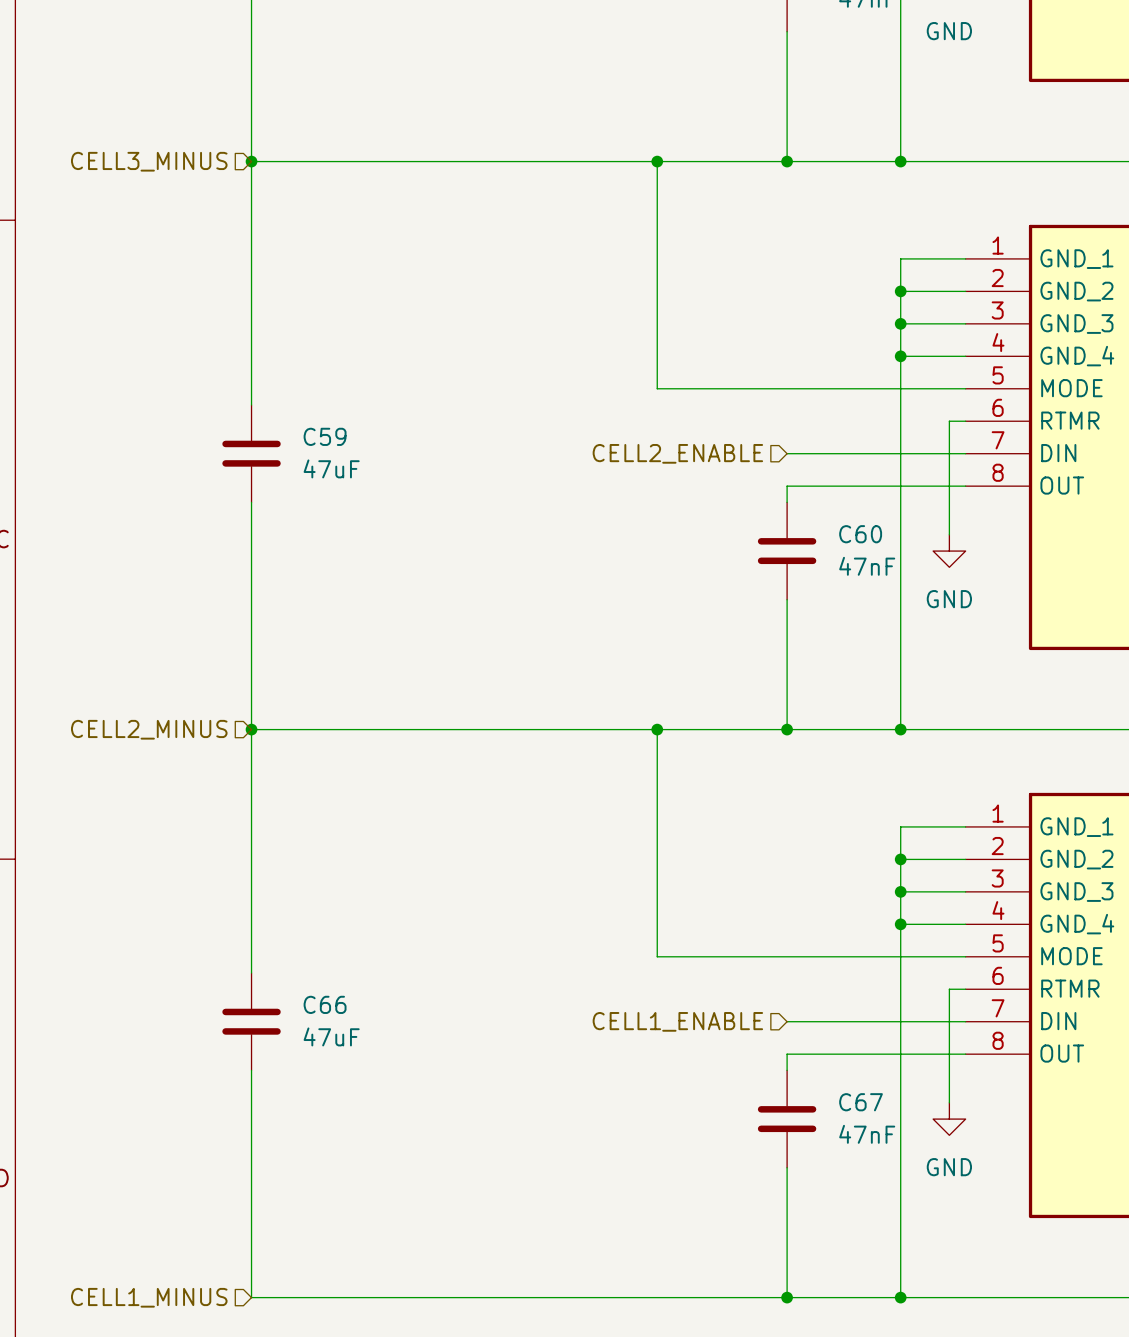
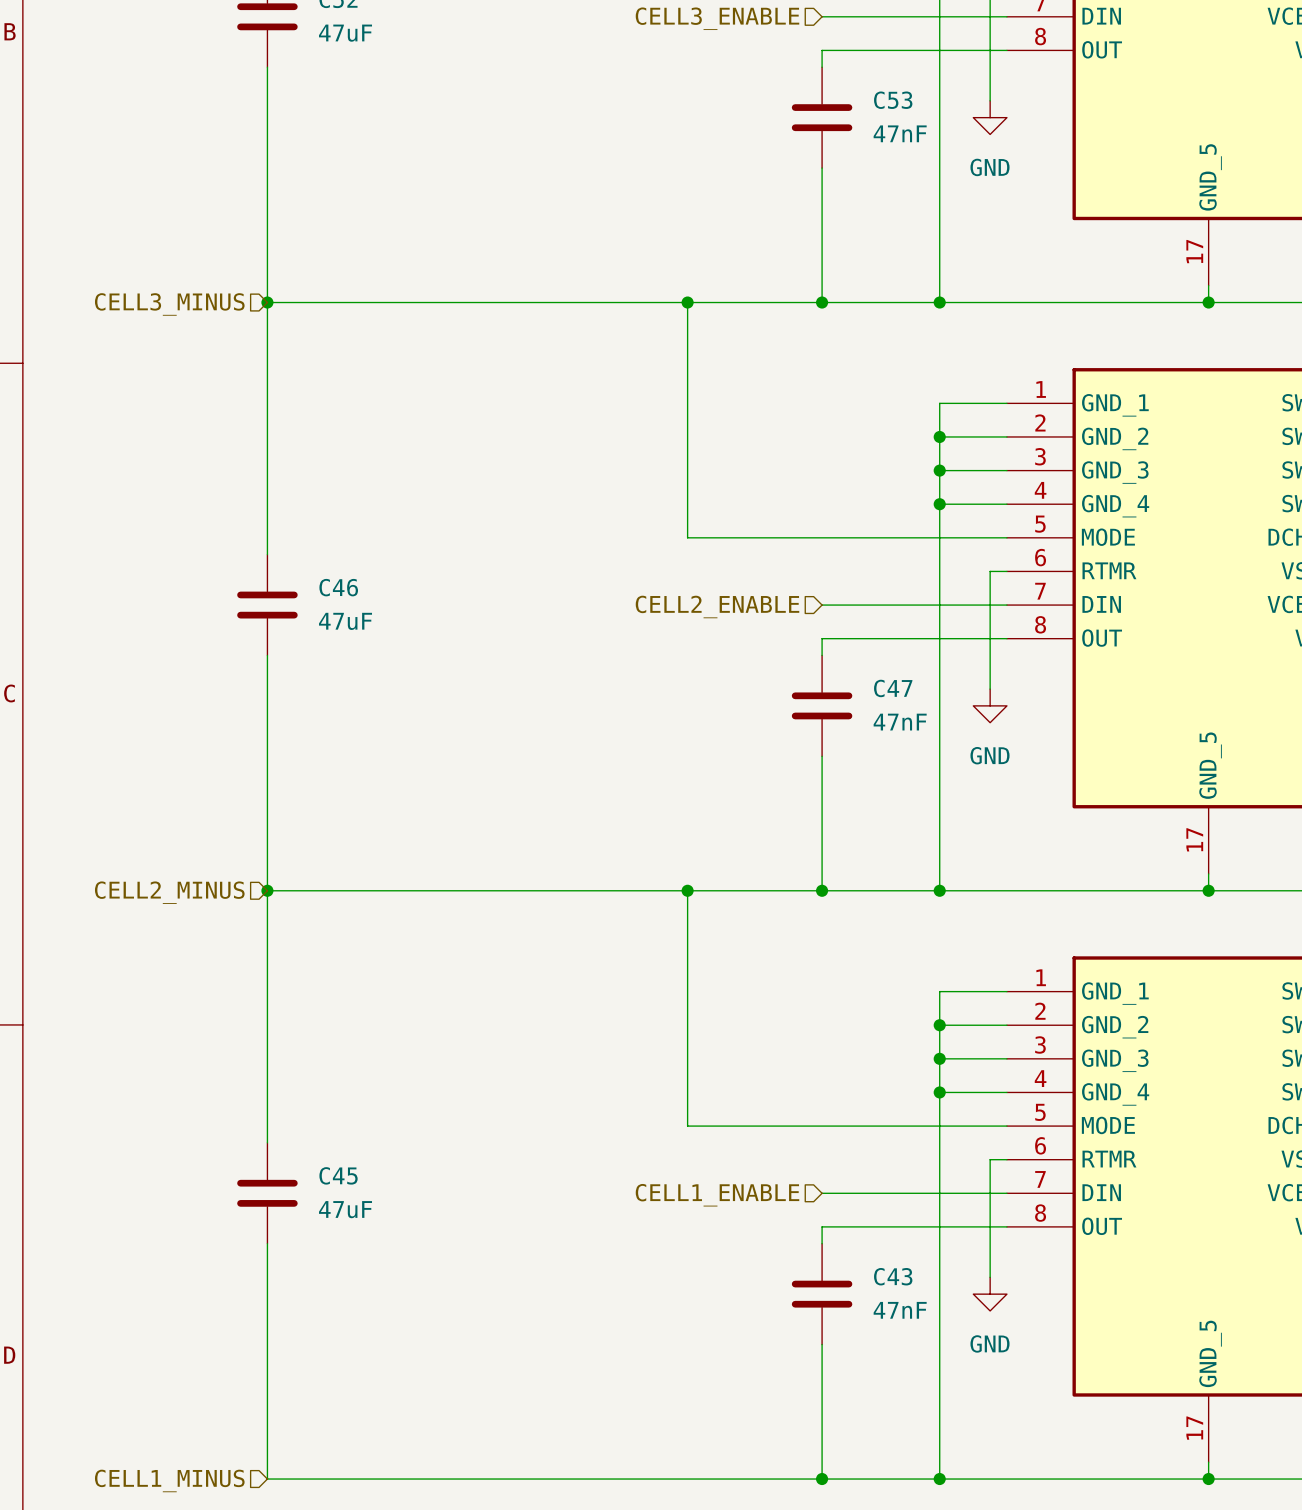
C59 name: C59 (325, 436) -> C46 (338, 587)
C60 name: C60 (860, 534) -> C47 (893, 688)
C66 name: C66 (325, 1004) -> C45 (338, 1175)
C67 name: C67 (861, 1102) -> C43 (893, 1276)

